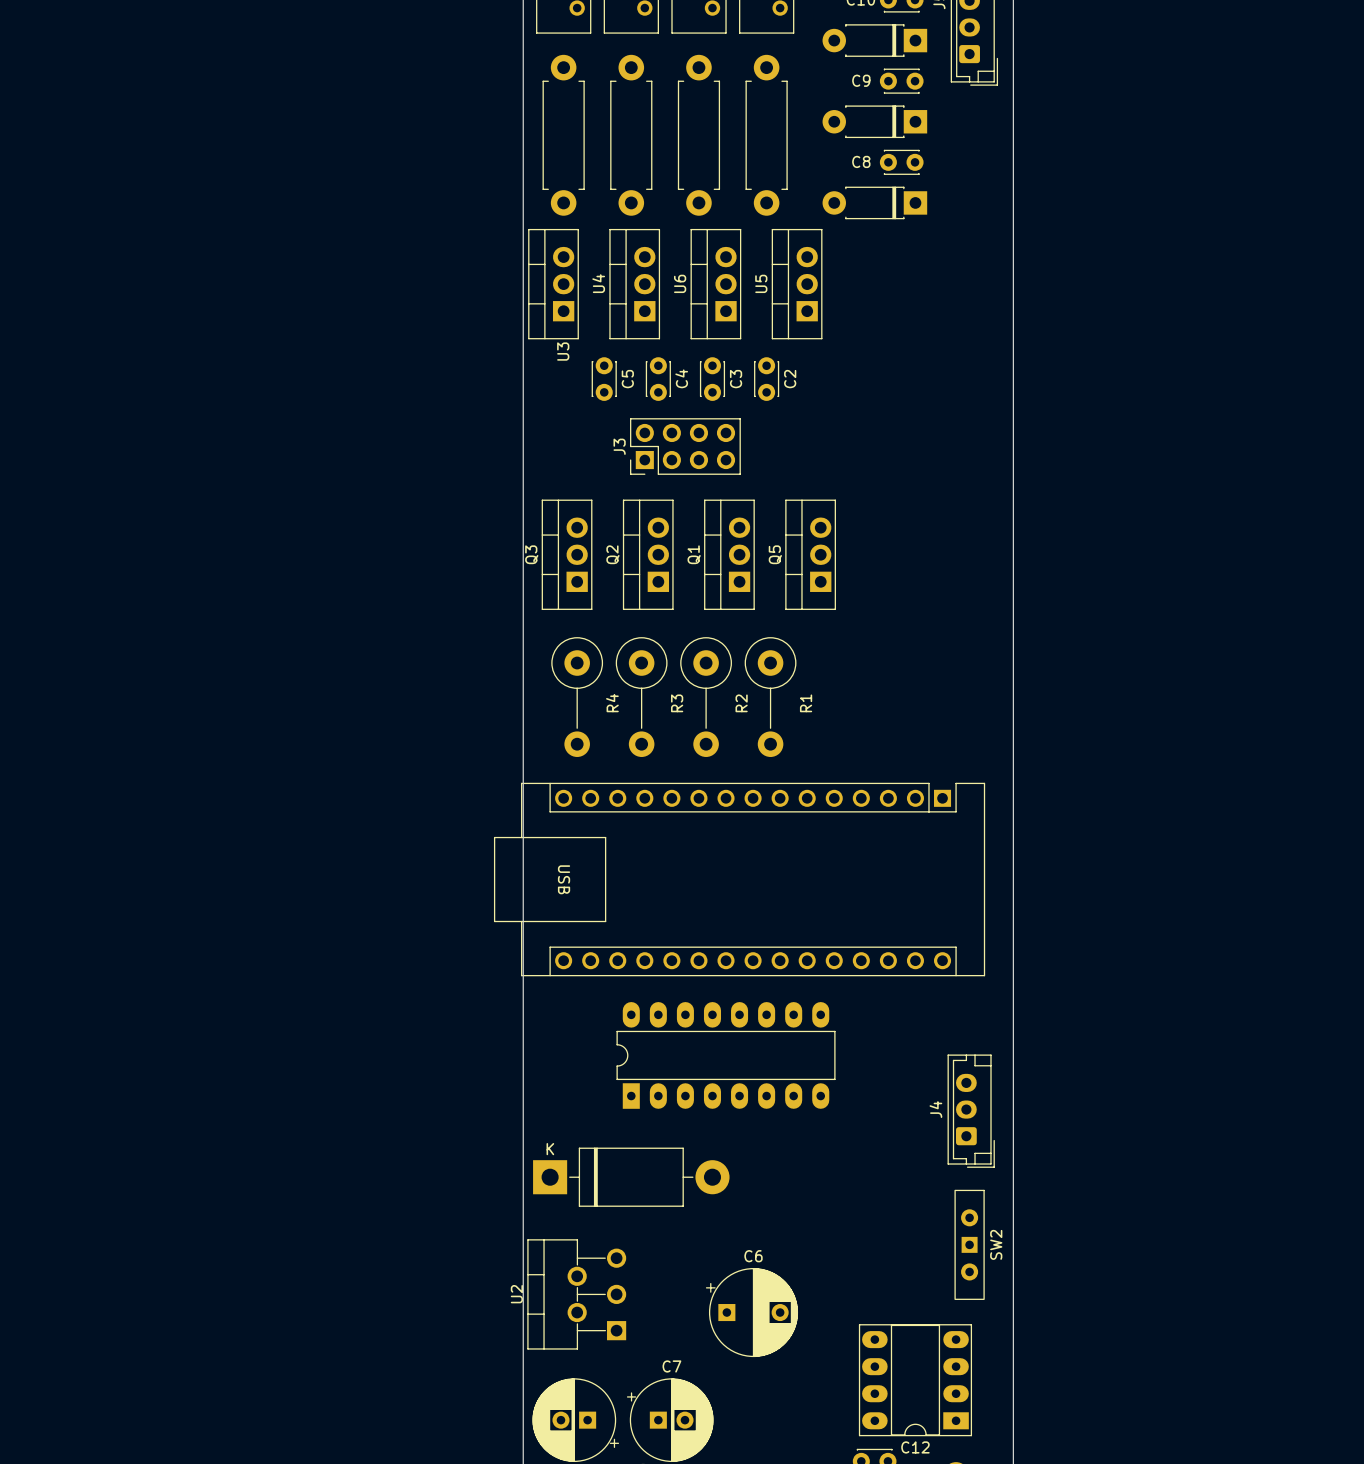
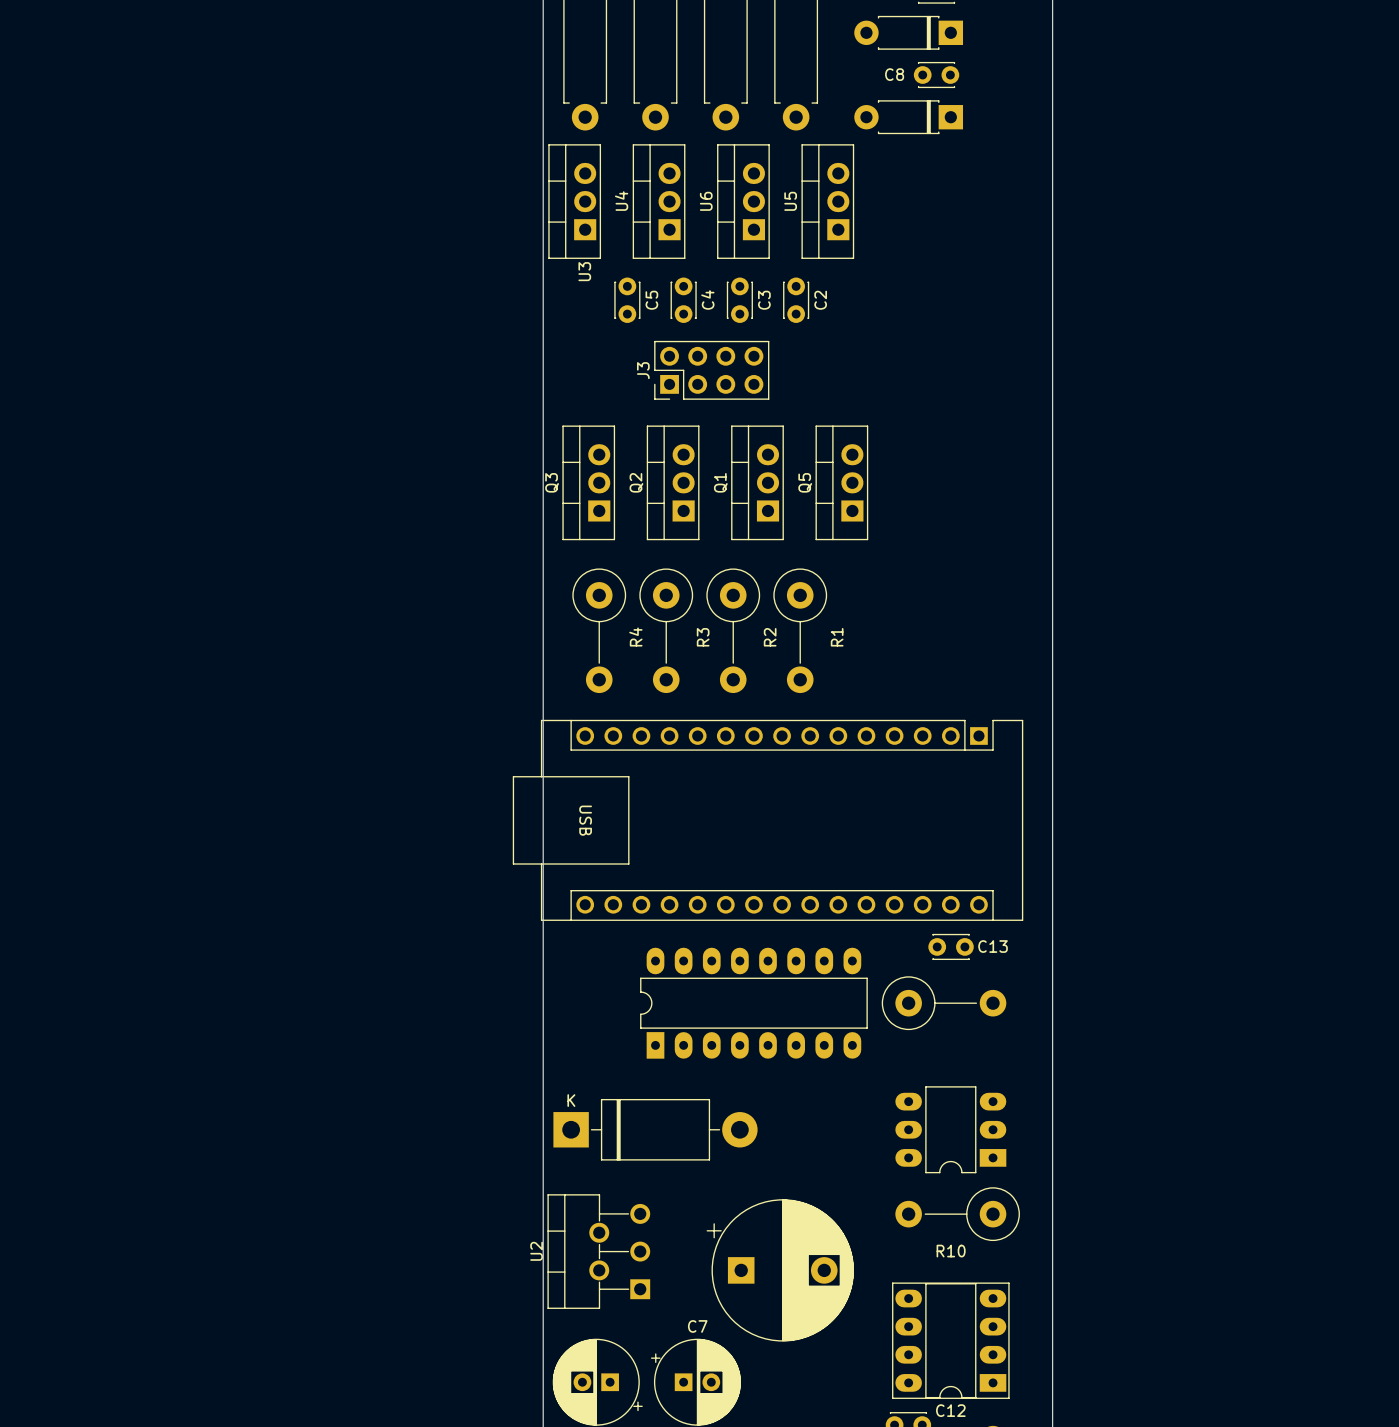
C13: none -> (951, 946)
part: none -> (944, 1003)
J4: (971, 1111) -> none
part: none -> (950, 1129)
SW2: (969, 1244) -> none
R10: none -> (957, 1214)
C6: (751, 1312) -> none
part: none -> (780, 1270)

